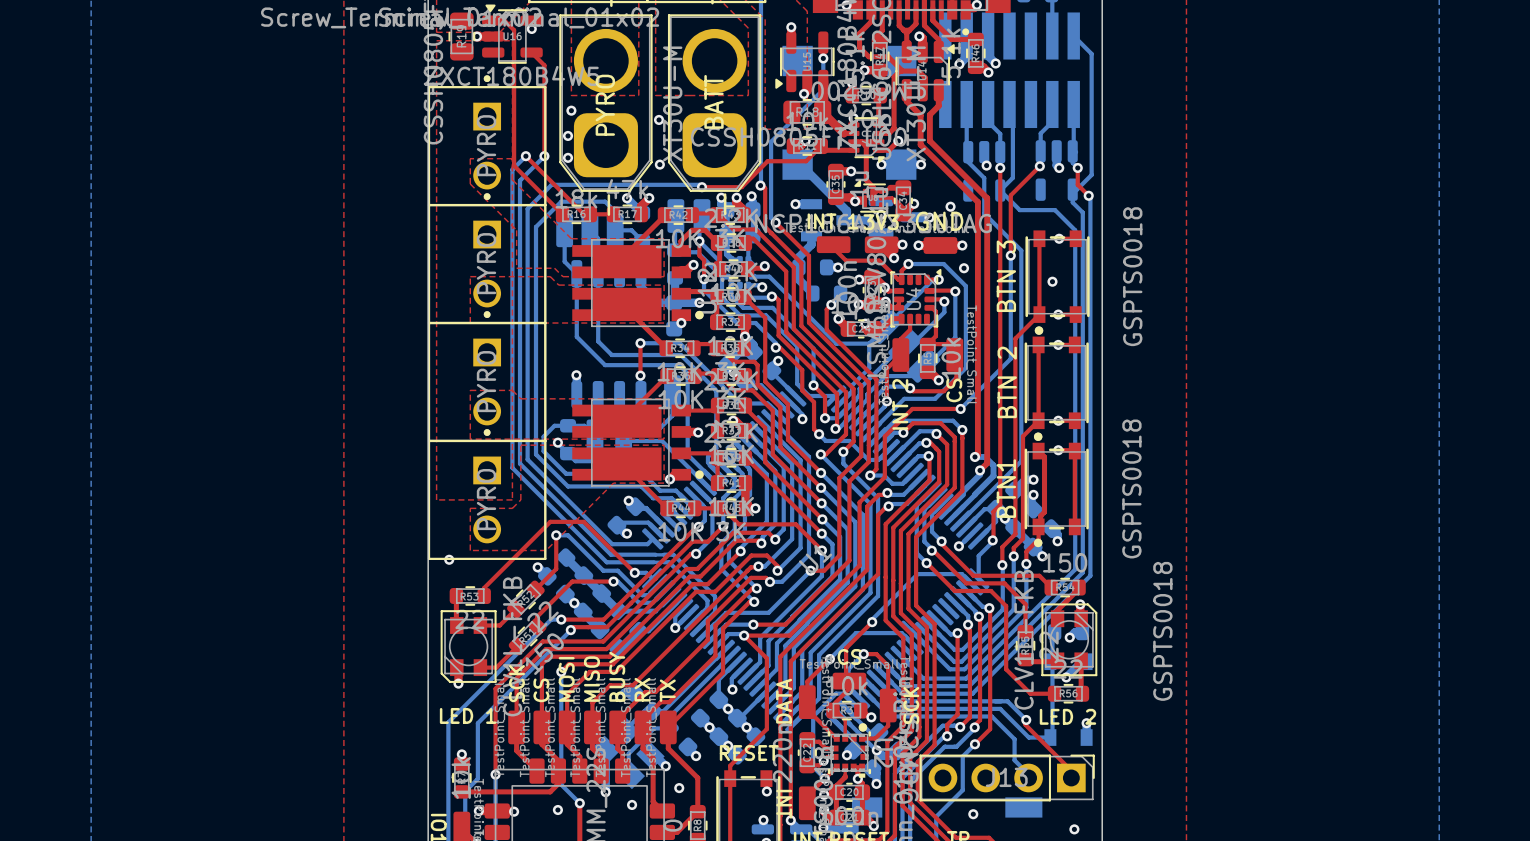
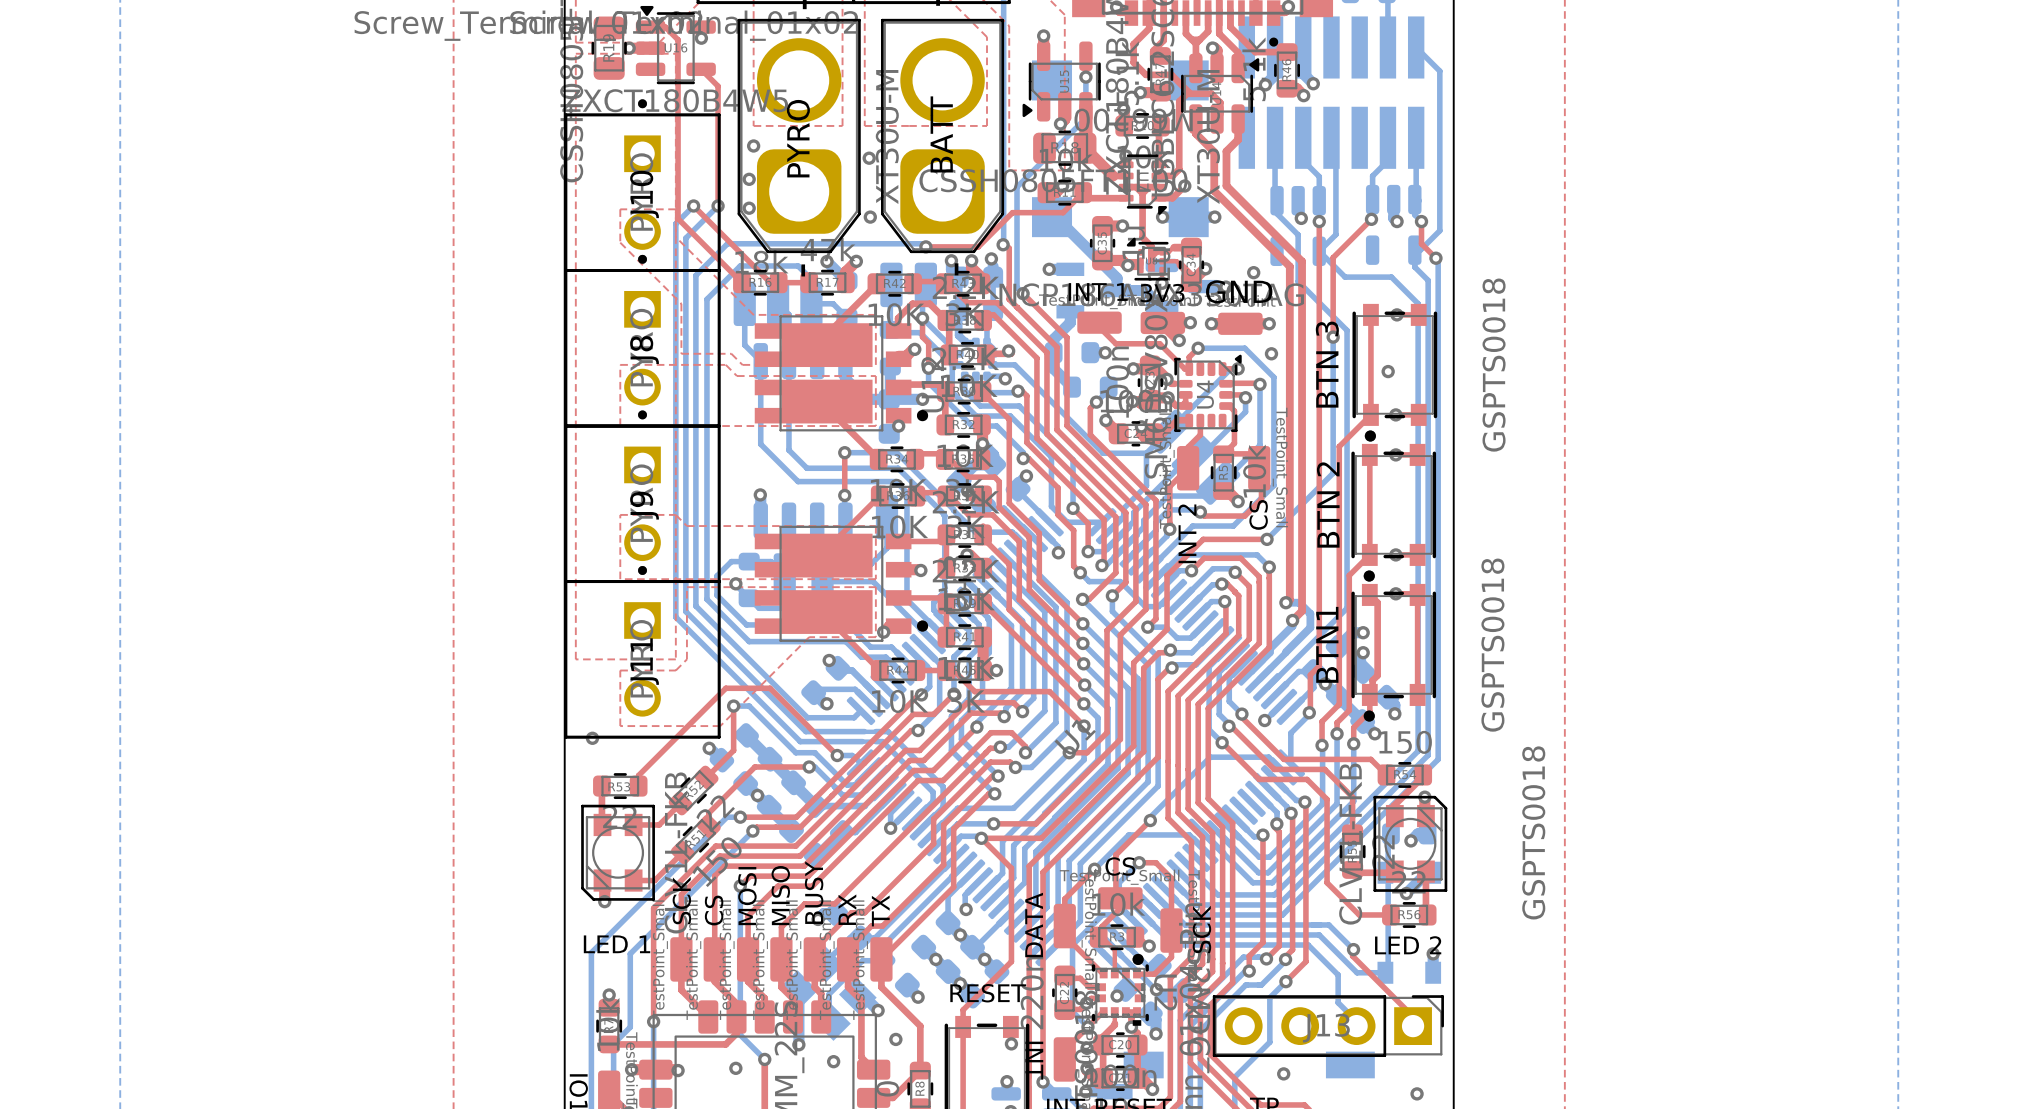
J10 name: none -> J10 (644, 194)
J8 name: none -> J8 (644, 350)
J9 name: none -> J9 (644, 505)
J11 name: none -> J11 (644, 661)

